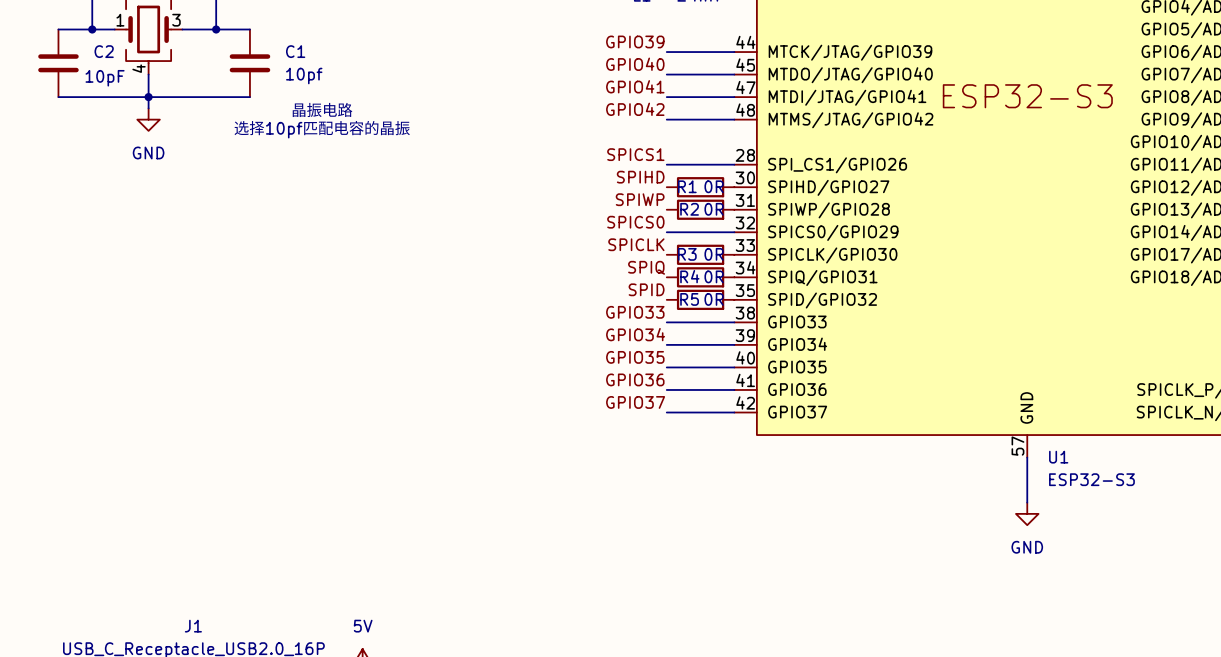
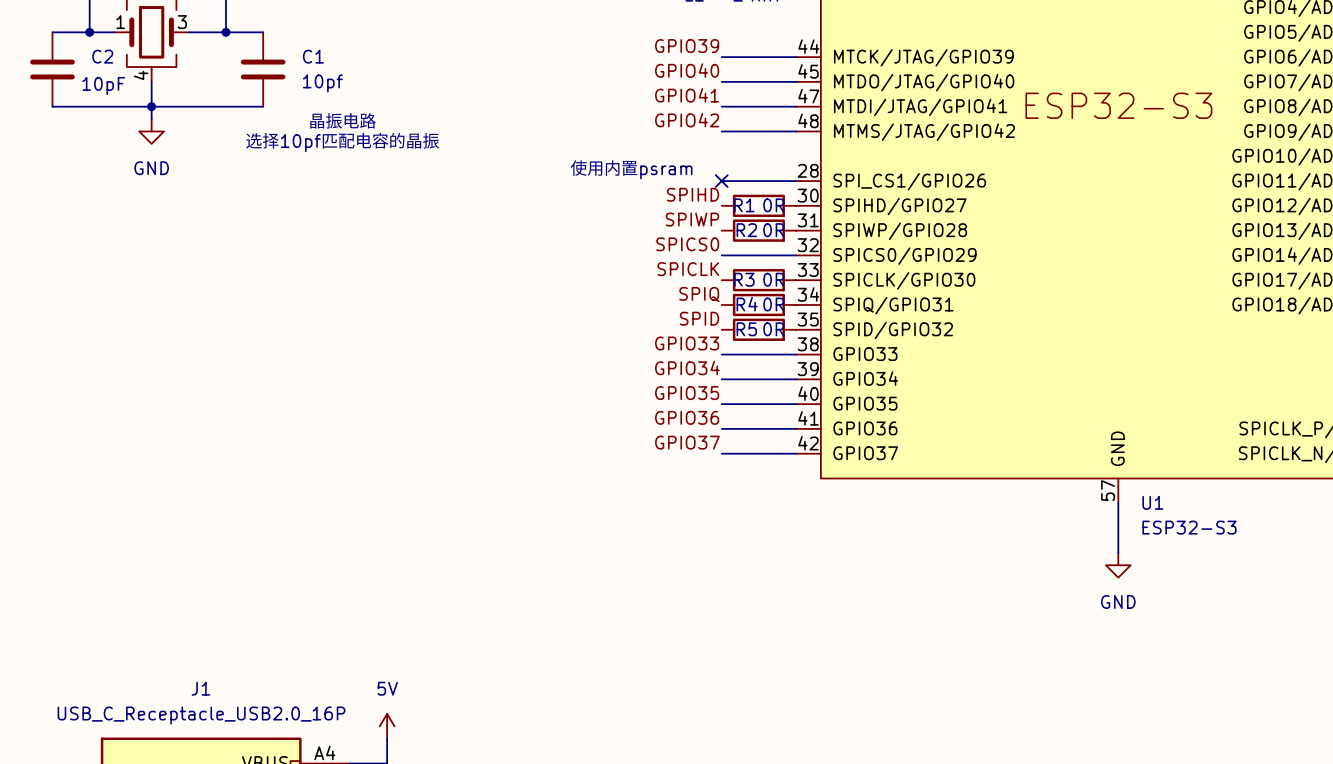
text: none -> 使用内置psram (631, 169)
label: SPICS1 (635, 154) -> none
no-connect mark: none -> (721, 181)

